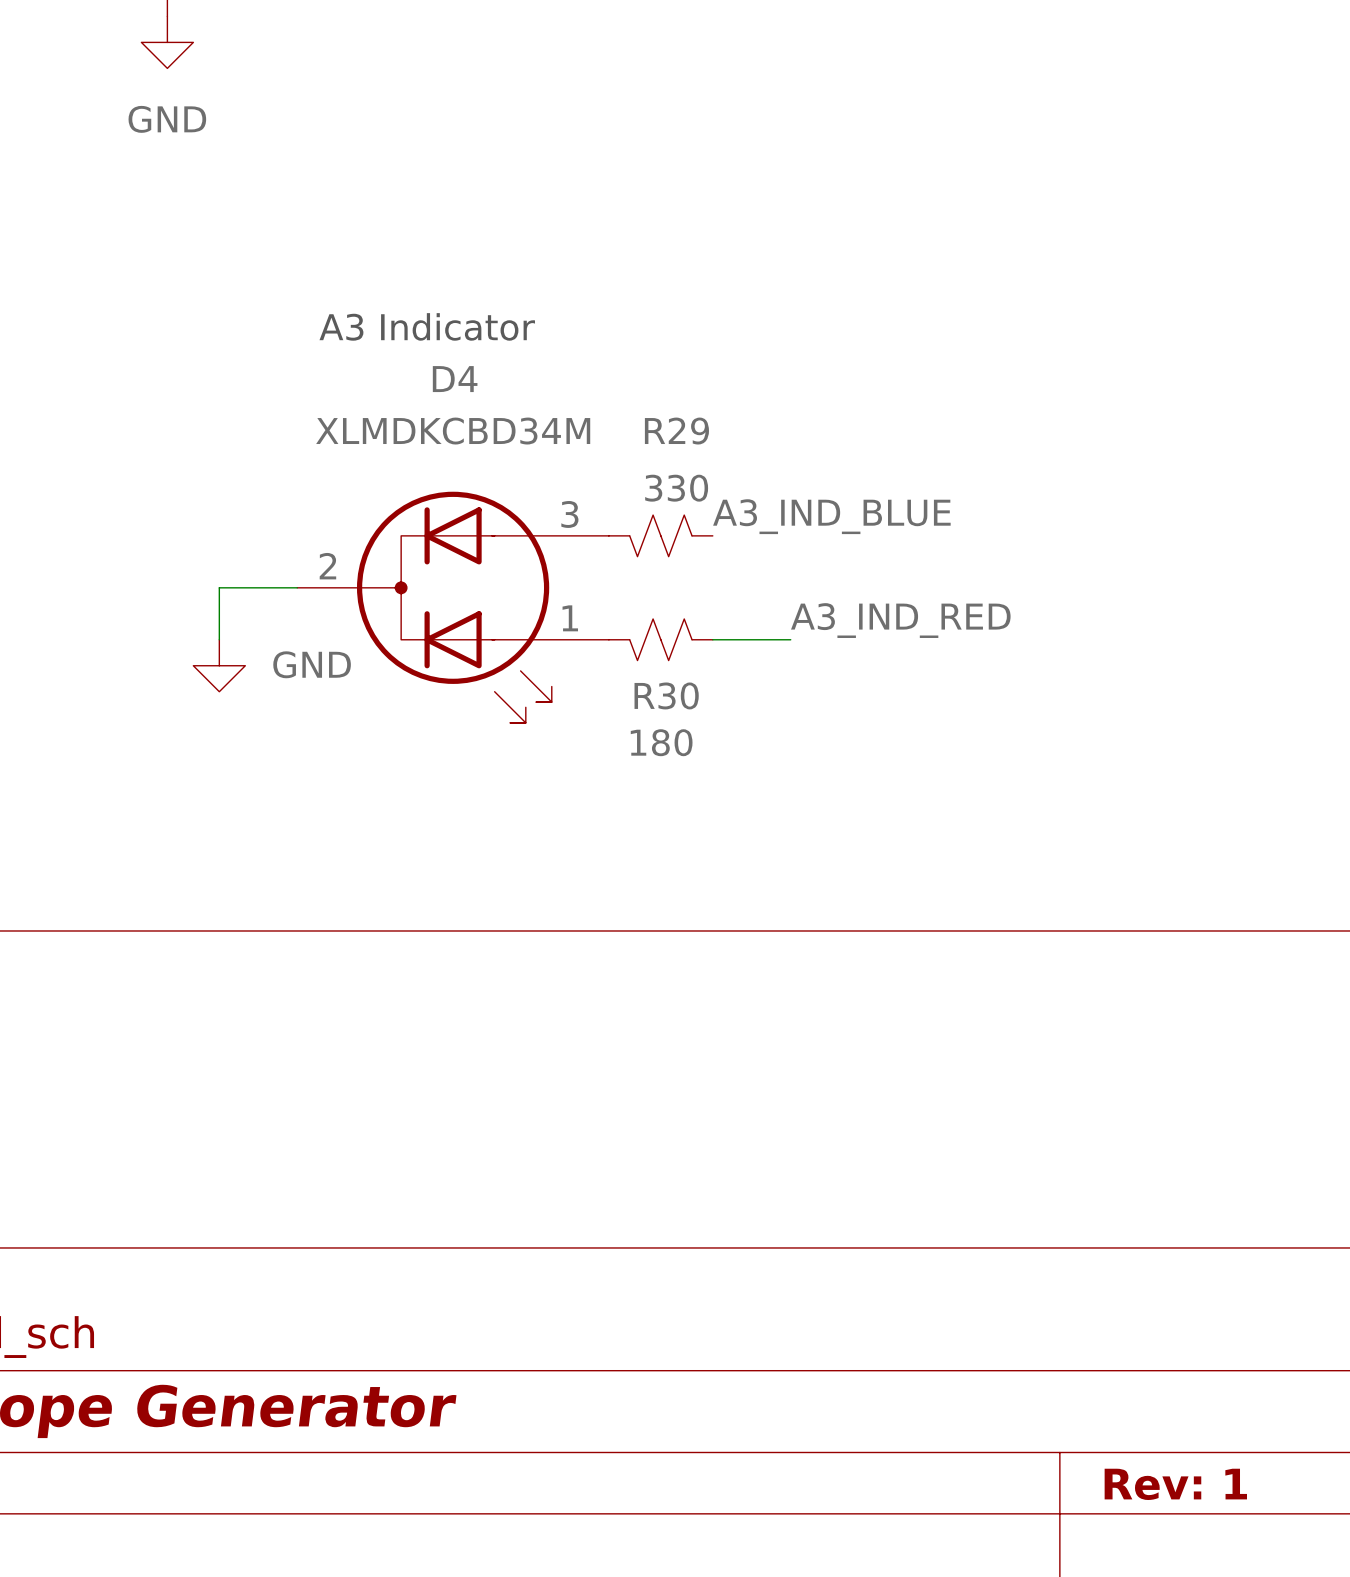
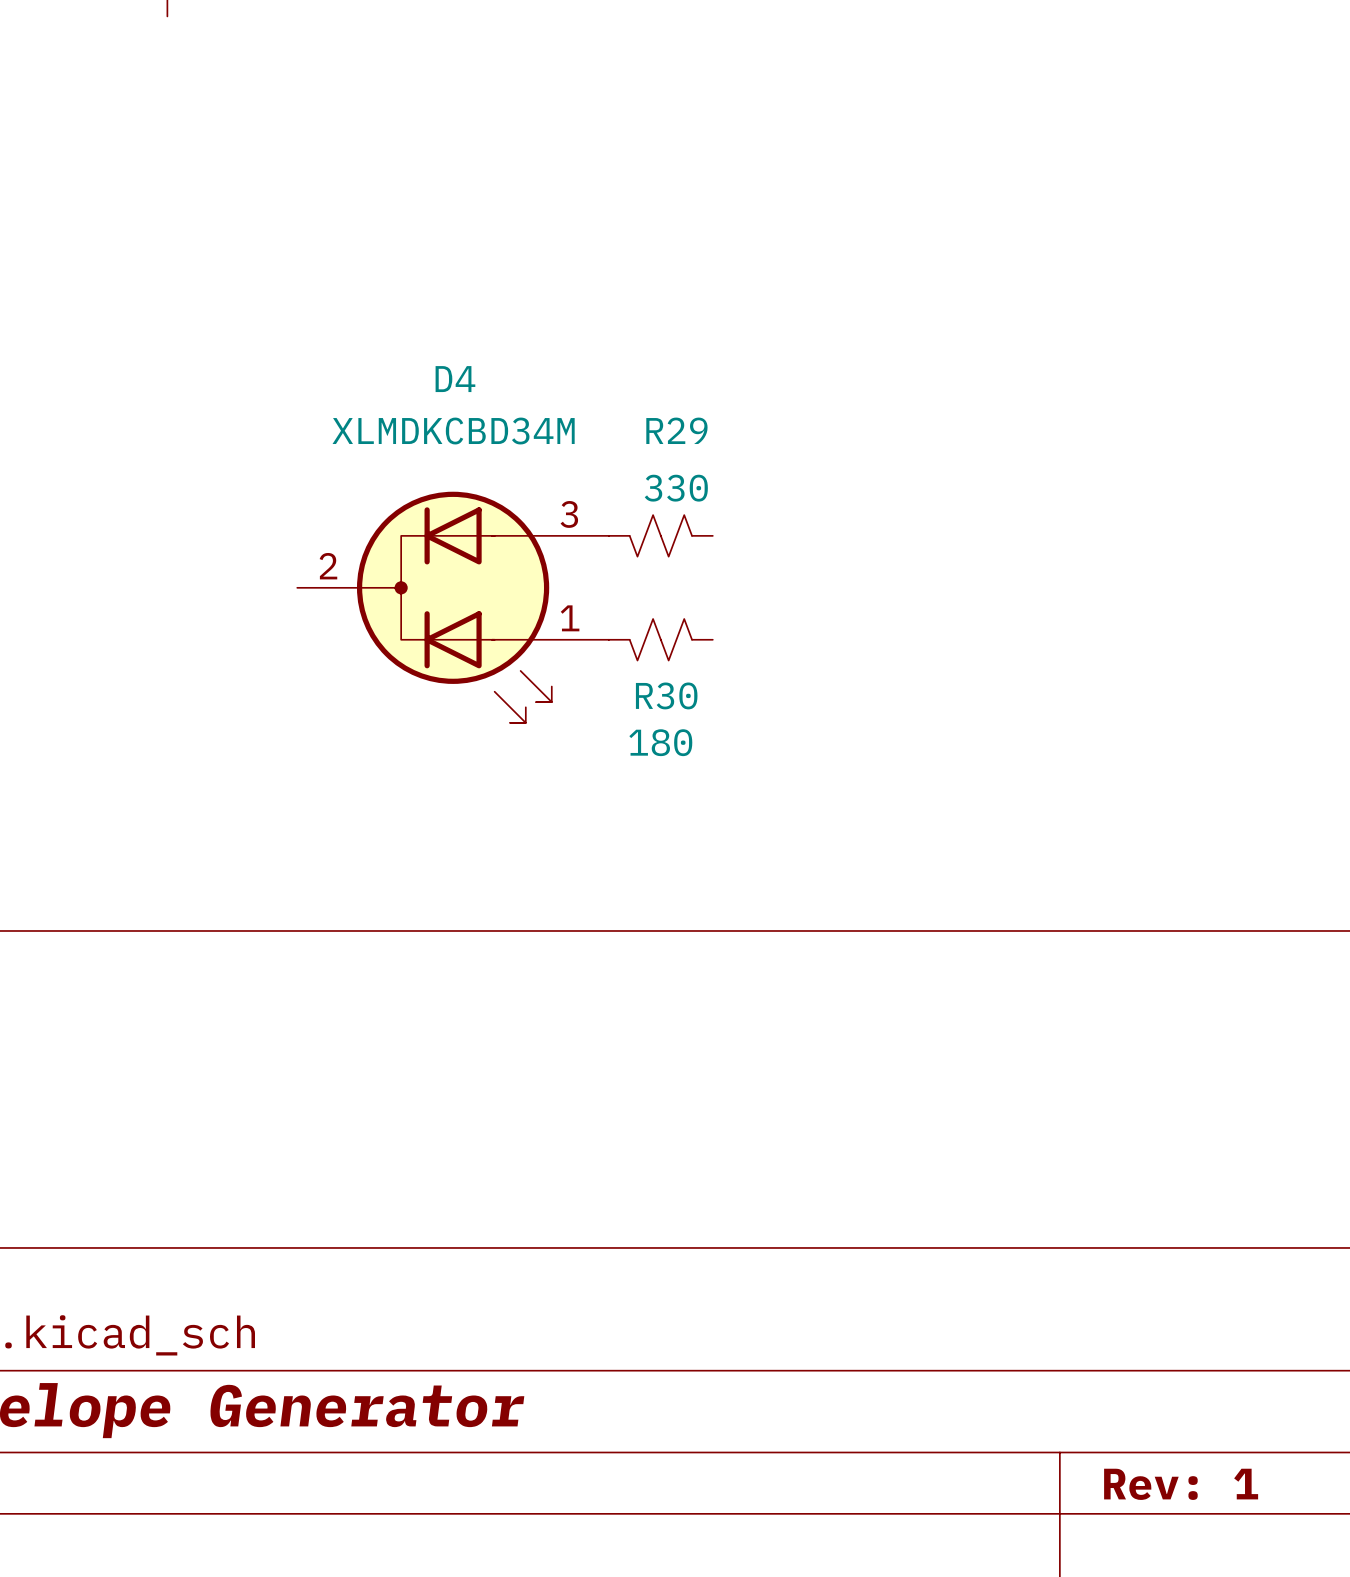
power symbol: GND (167, 42) -> none
text: A3 Indicator (427, 326) -> none
label: A3_IND_BLUE (831, 516) -> none
wire: (297, 587) (219, 587) (219, 639) -> none
label: A3_IND_RED (900, 620) -> none
wire: (712, 639) (790, 639) -> none
power symbol: GND (219, 665) -> none

